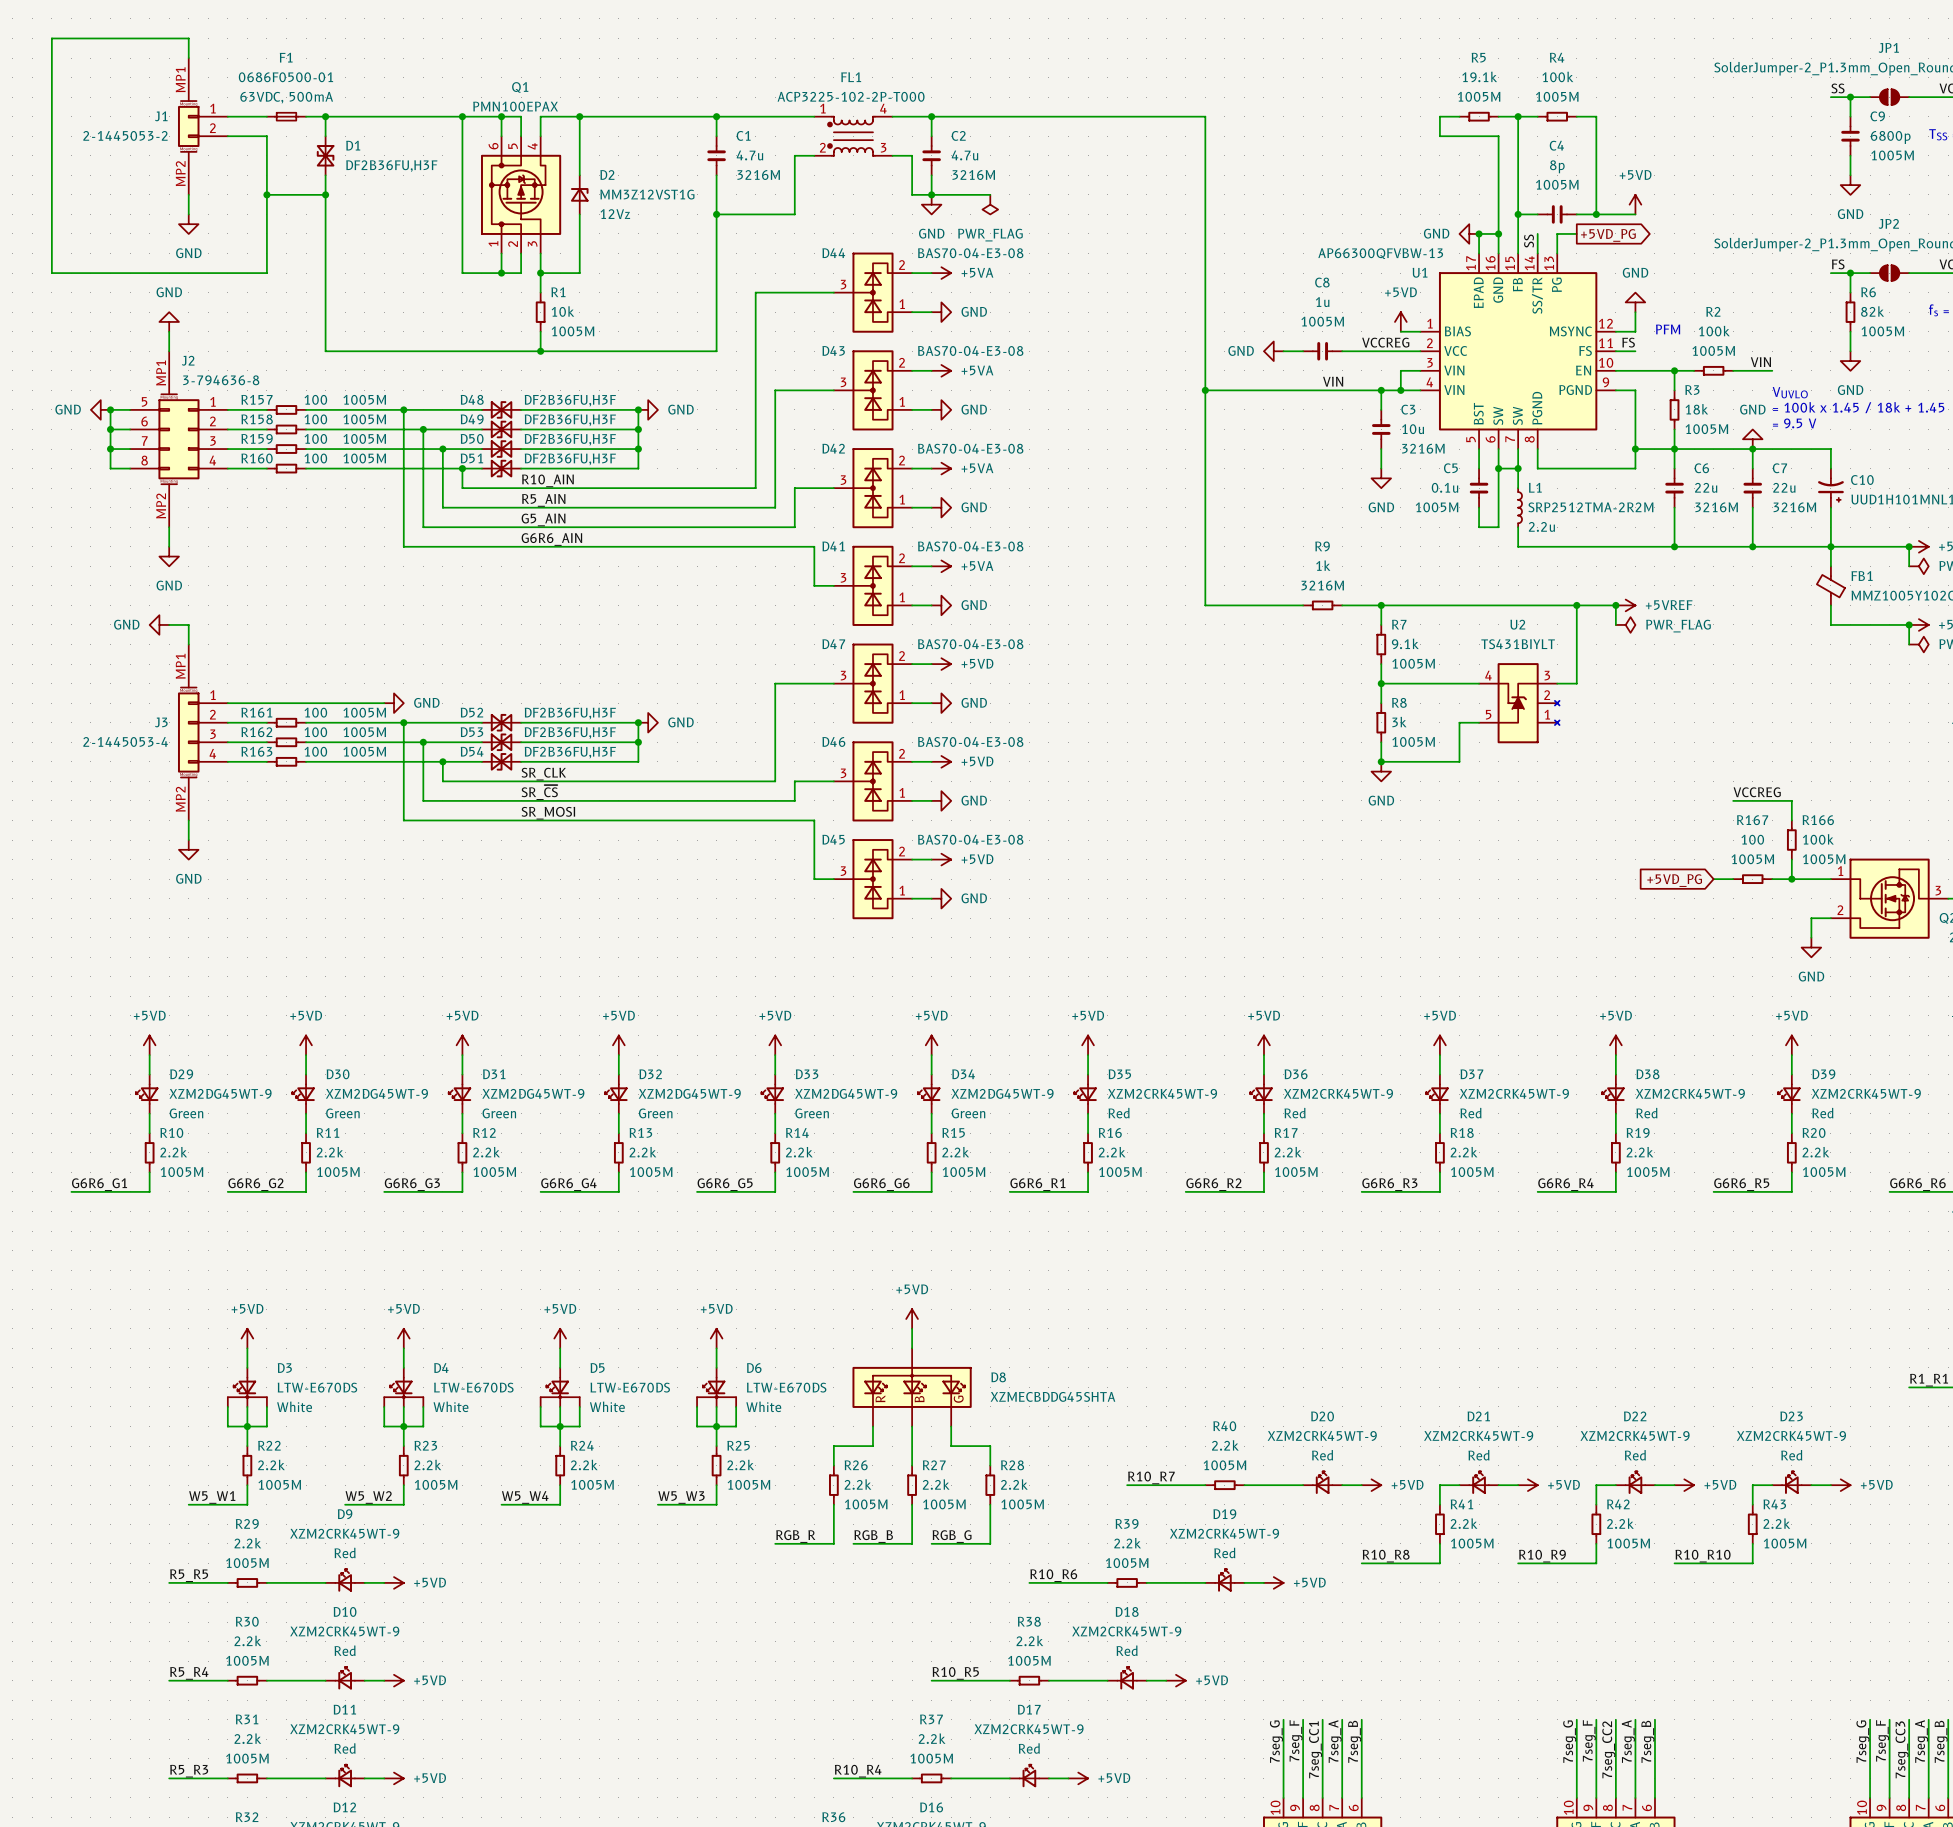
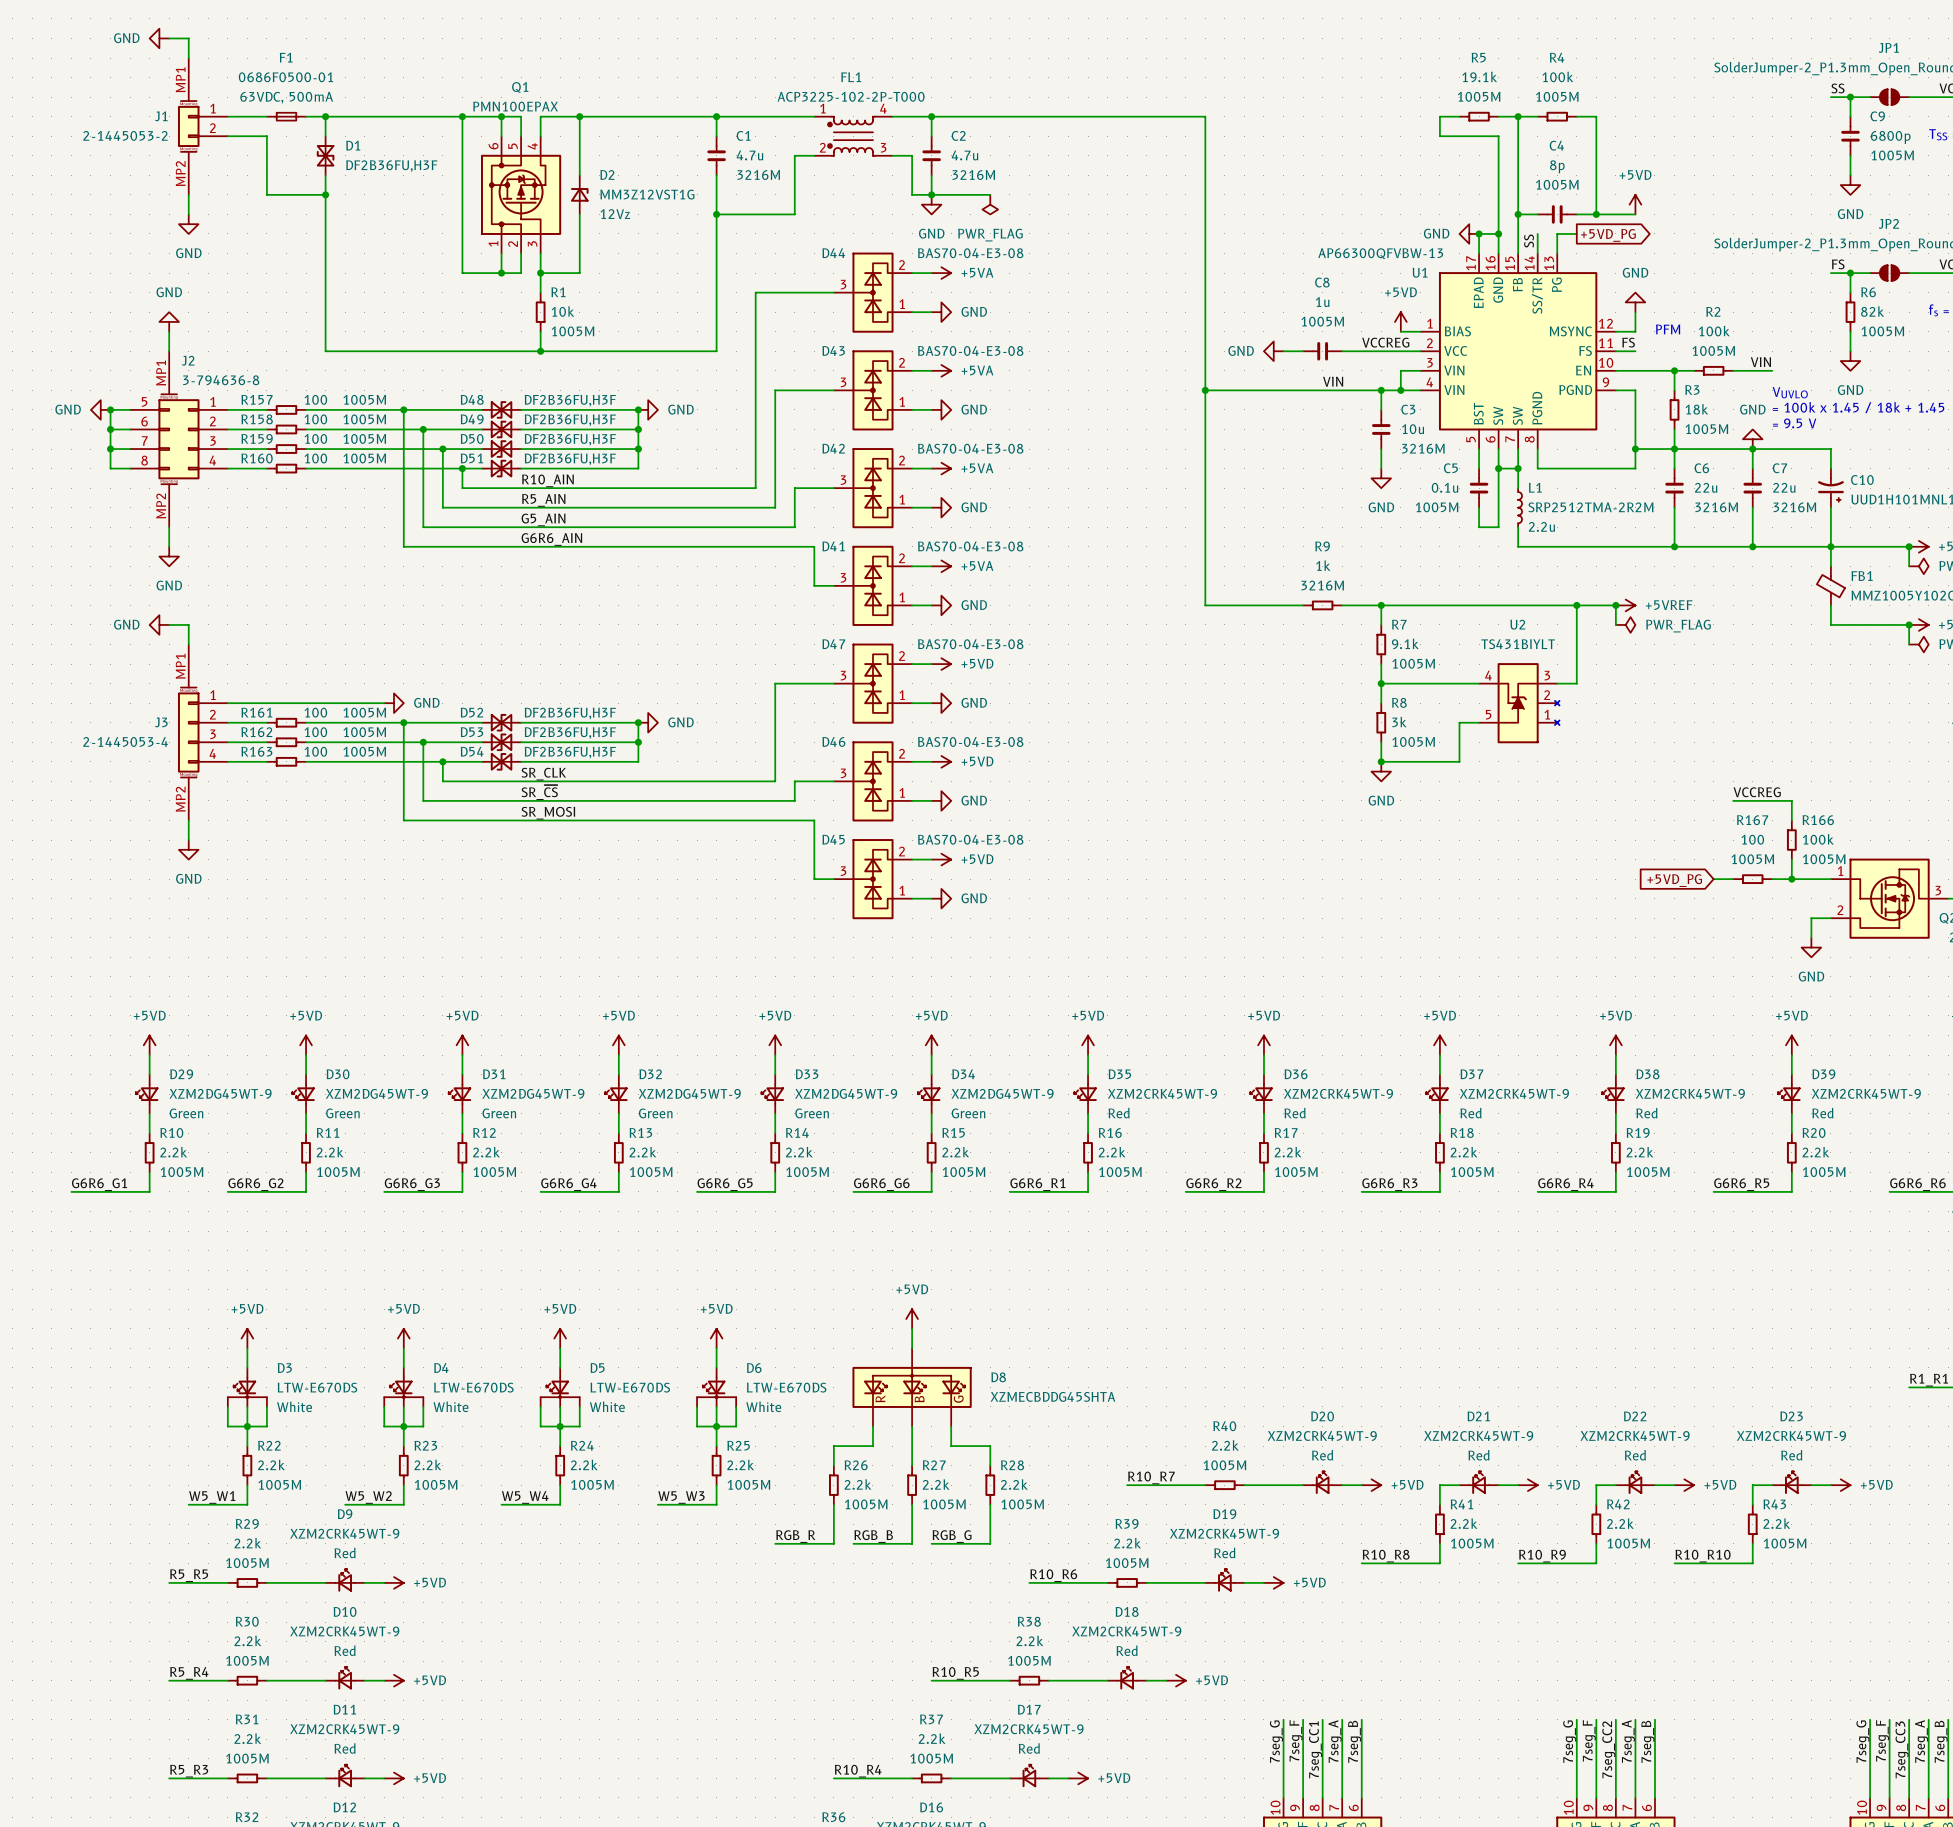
power symbol: none -> GND (159, 38)
wire: (169, 38) (51, 38) (51, 273) (266, 273) (266, 194) -> none
junction: (266, 194) -> none

